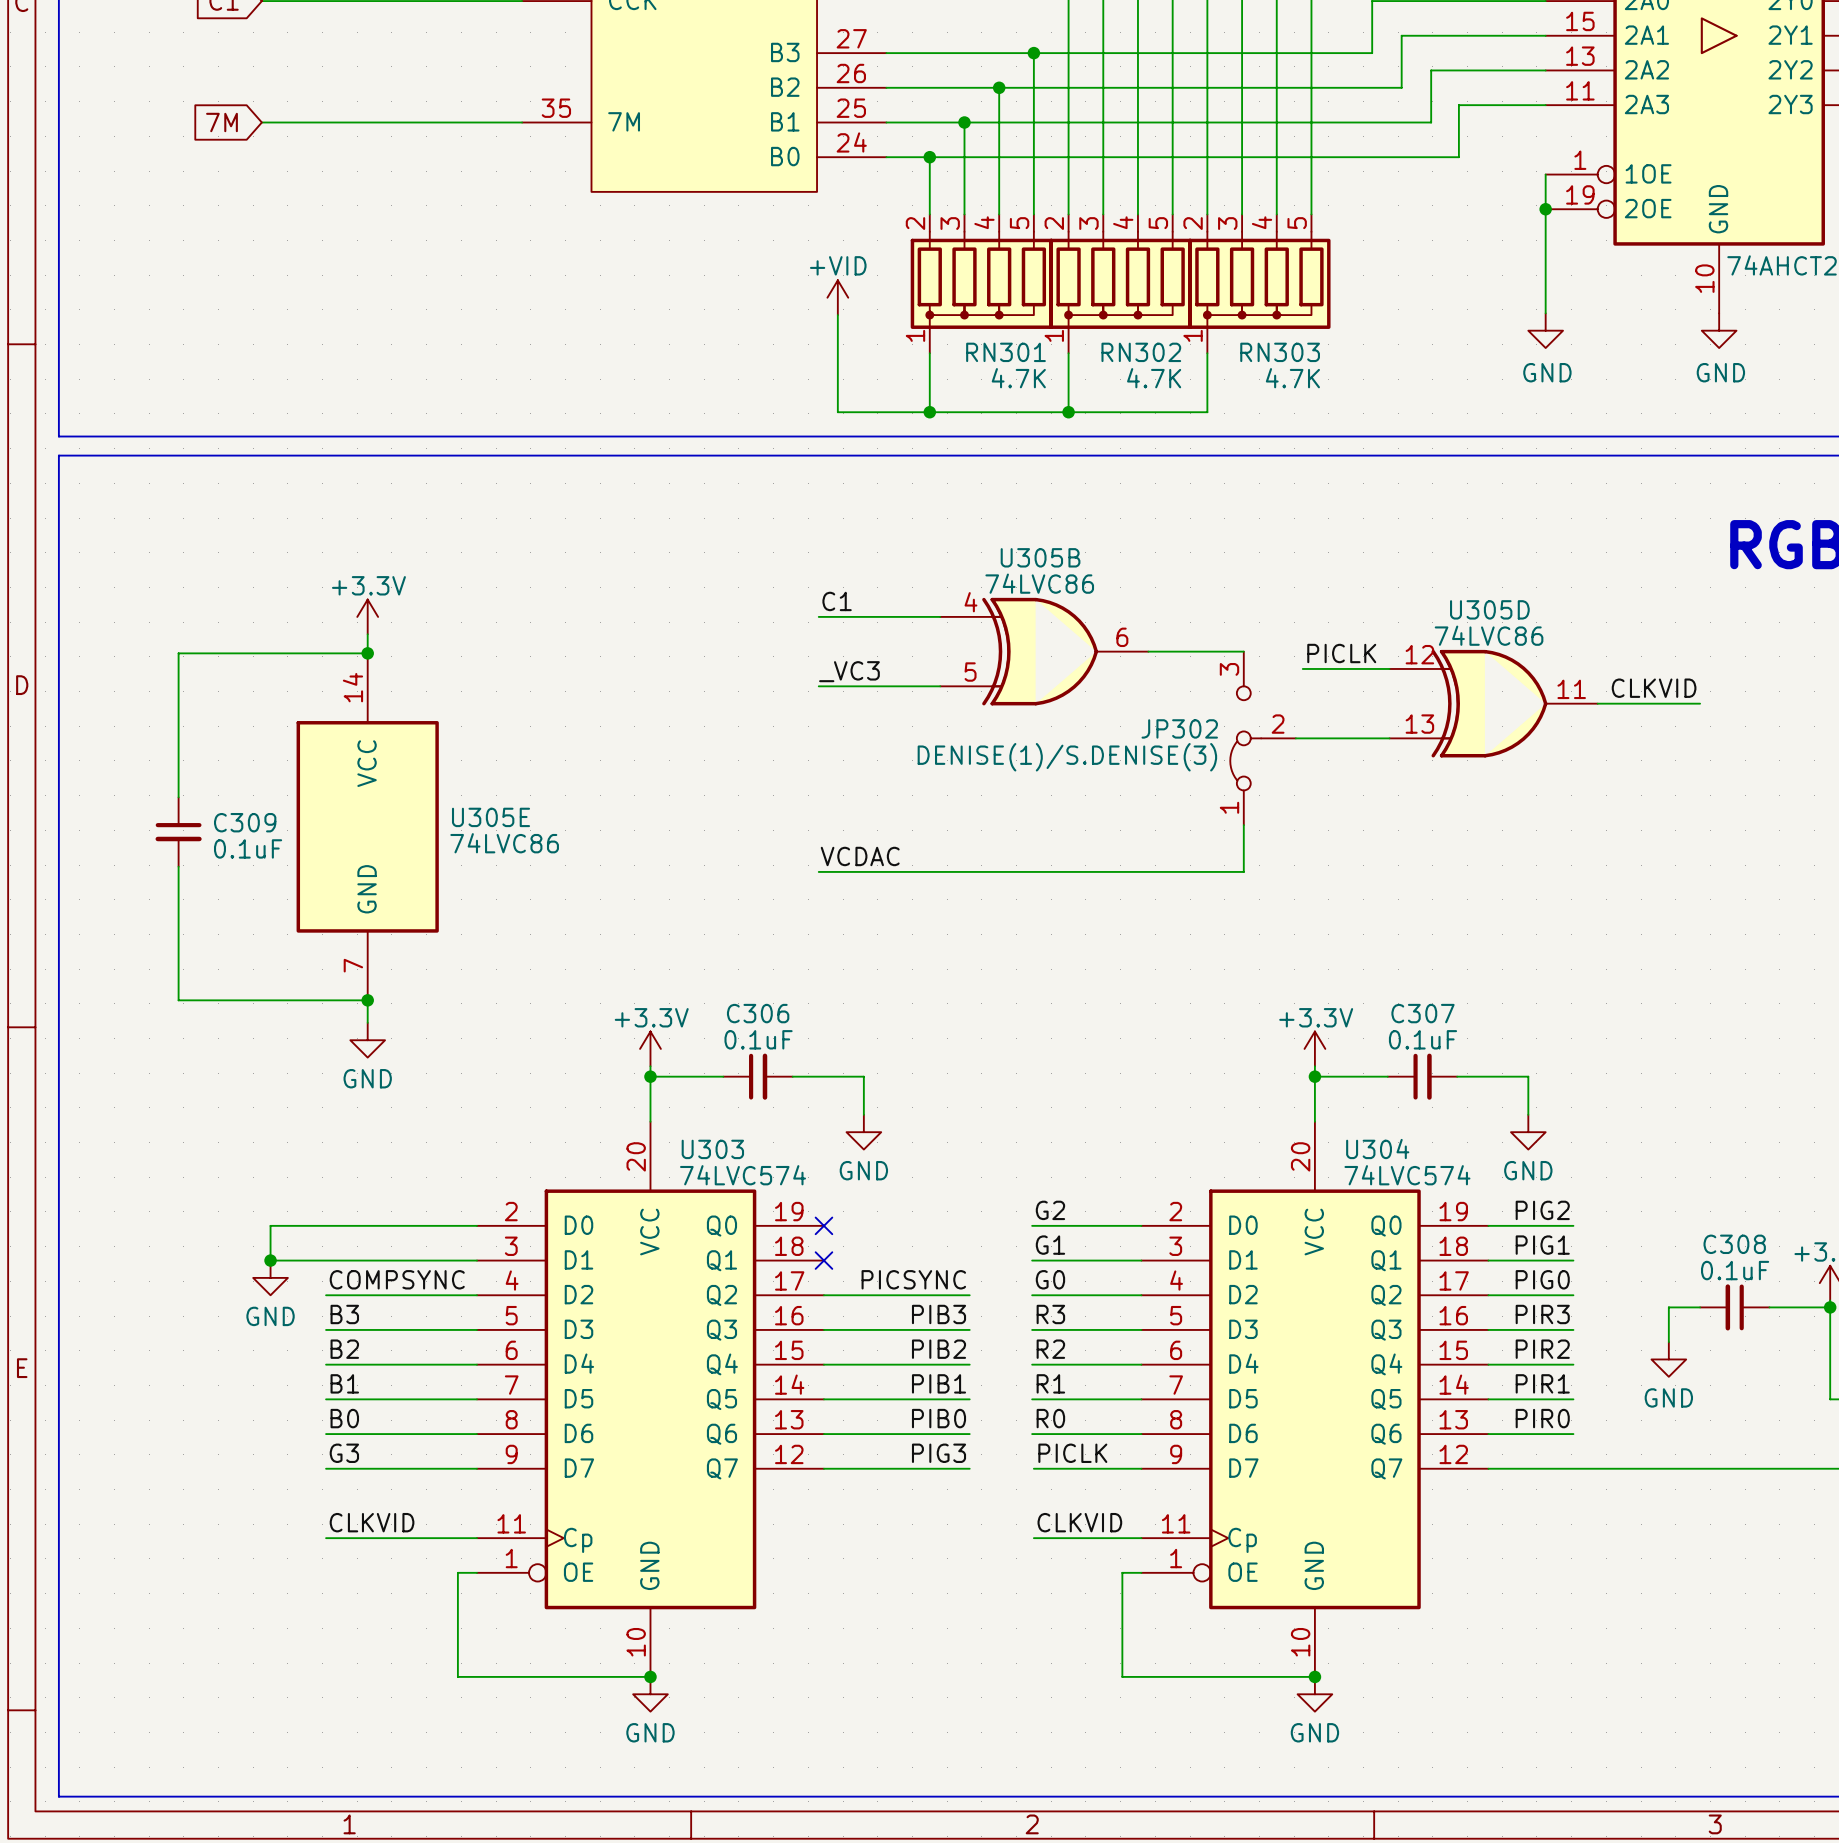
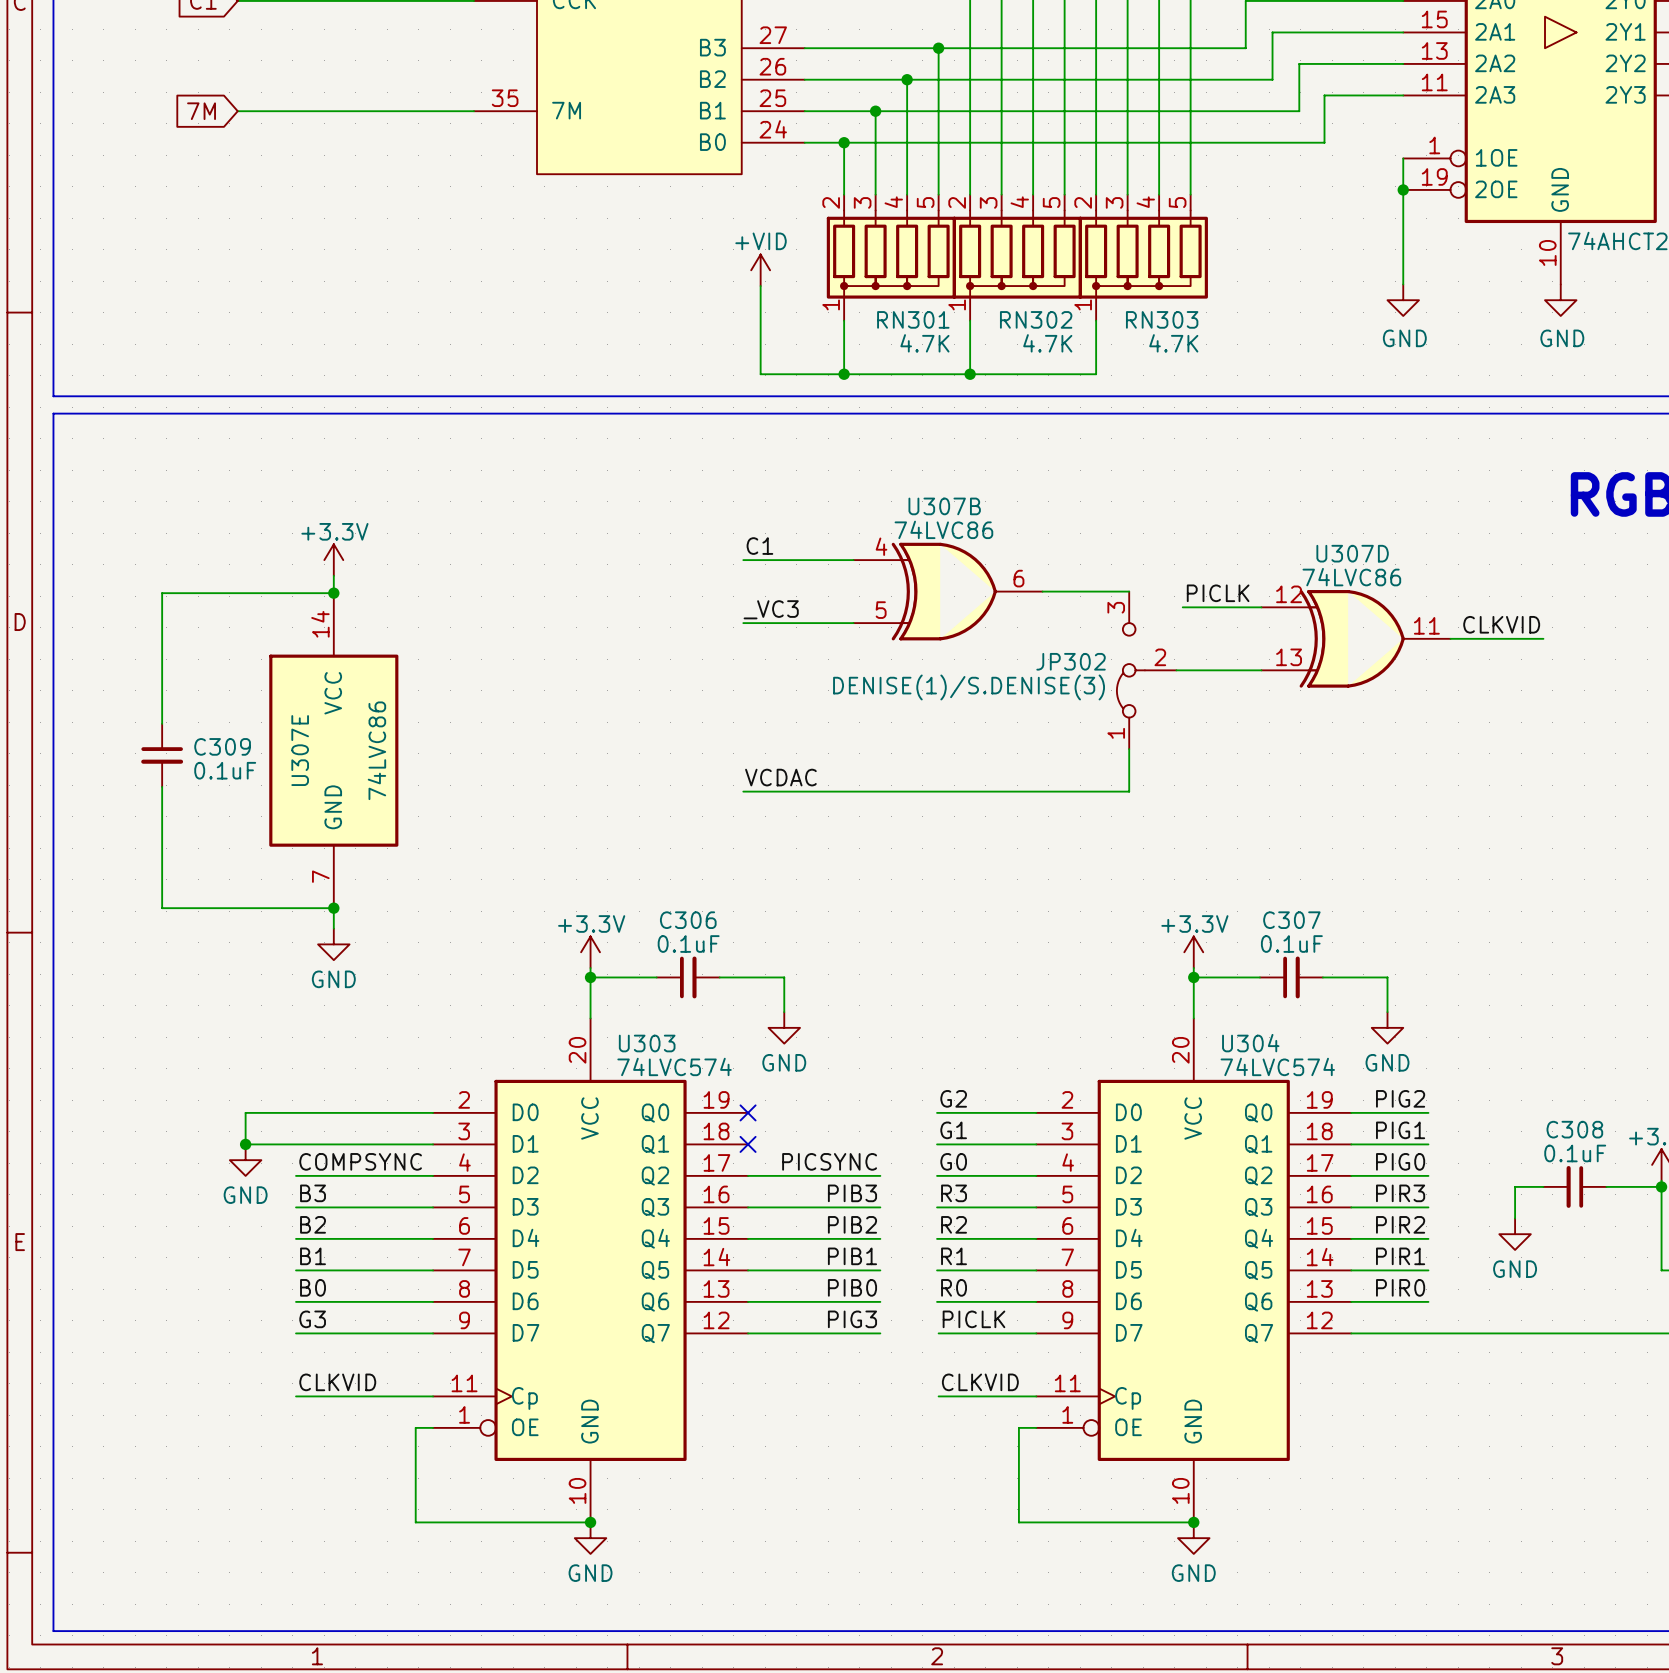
U305B name: U305B (1040, 557) -> U307B (944, 506)
U305D name: U305D (1489, 609) -> U307D (1352, 553)
U305E name: U305E (491, 817) -> U307E (300, 750)
U305E value rotation: 0° (504, 843) -> 90° counterclockwise (376, 750)

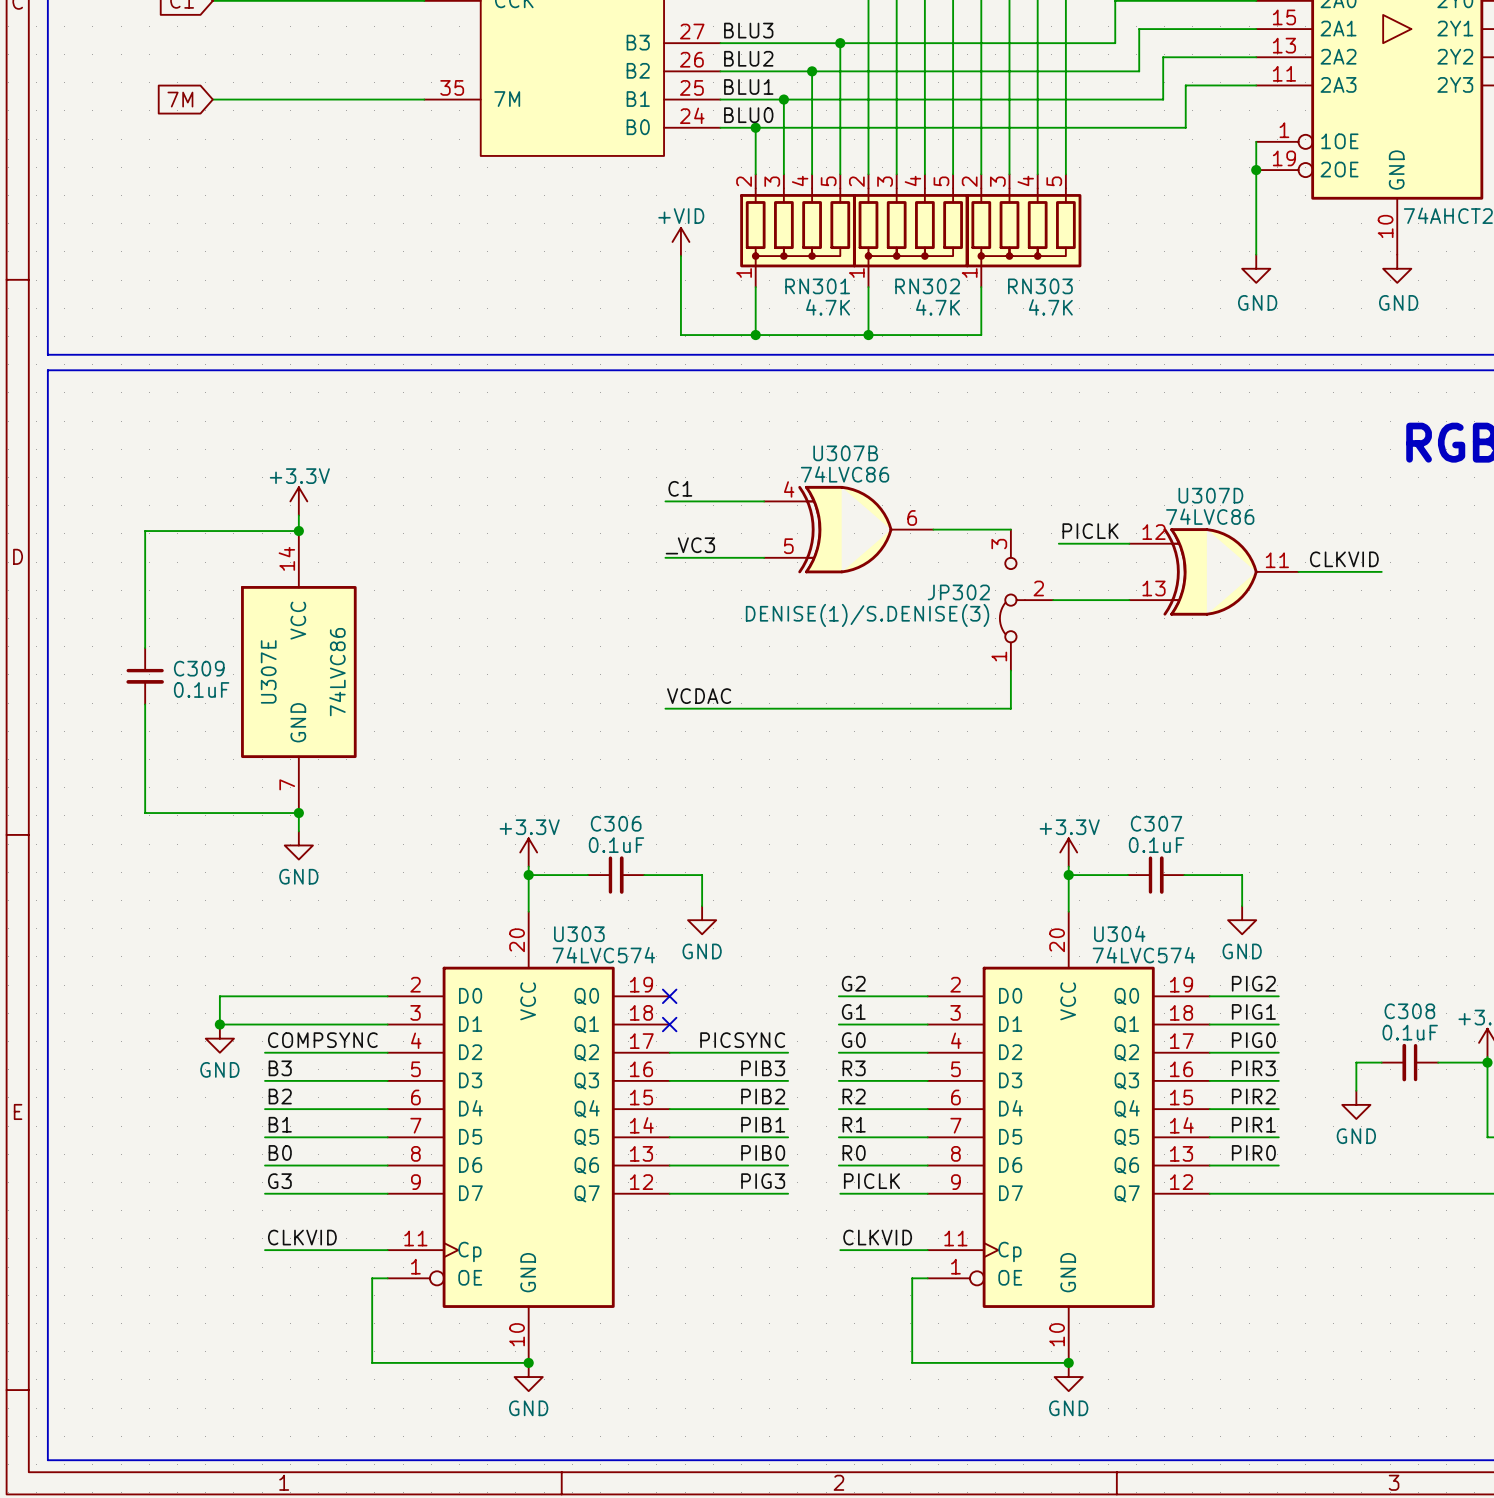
label: none -> BLU3 (748, 30)
label: none -> BLU2 (748, 58)
label: none -> BLU1 (748, 86)
label: none -> BLU0 (748, 115)

